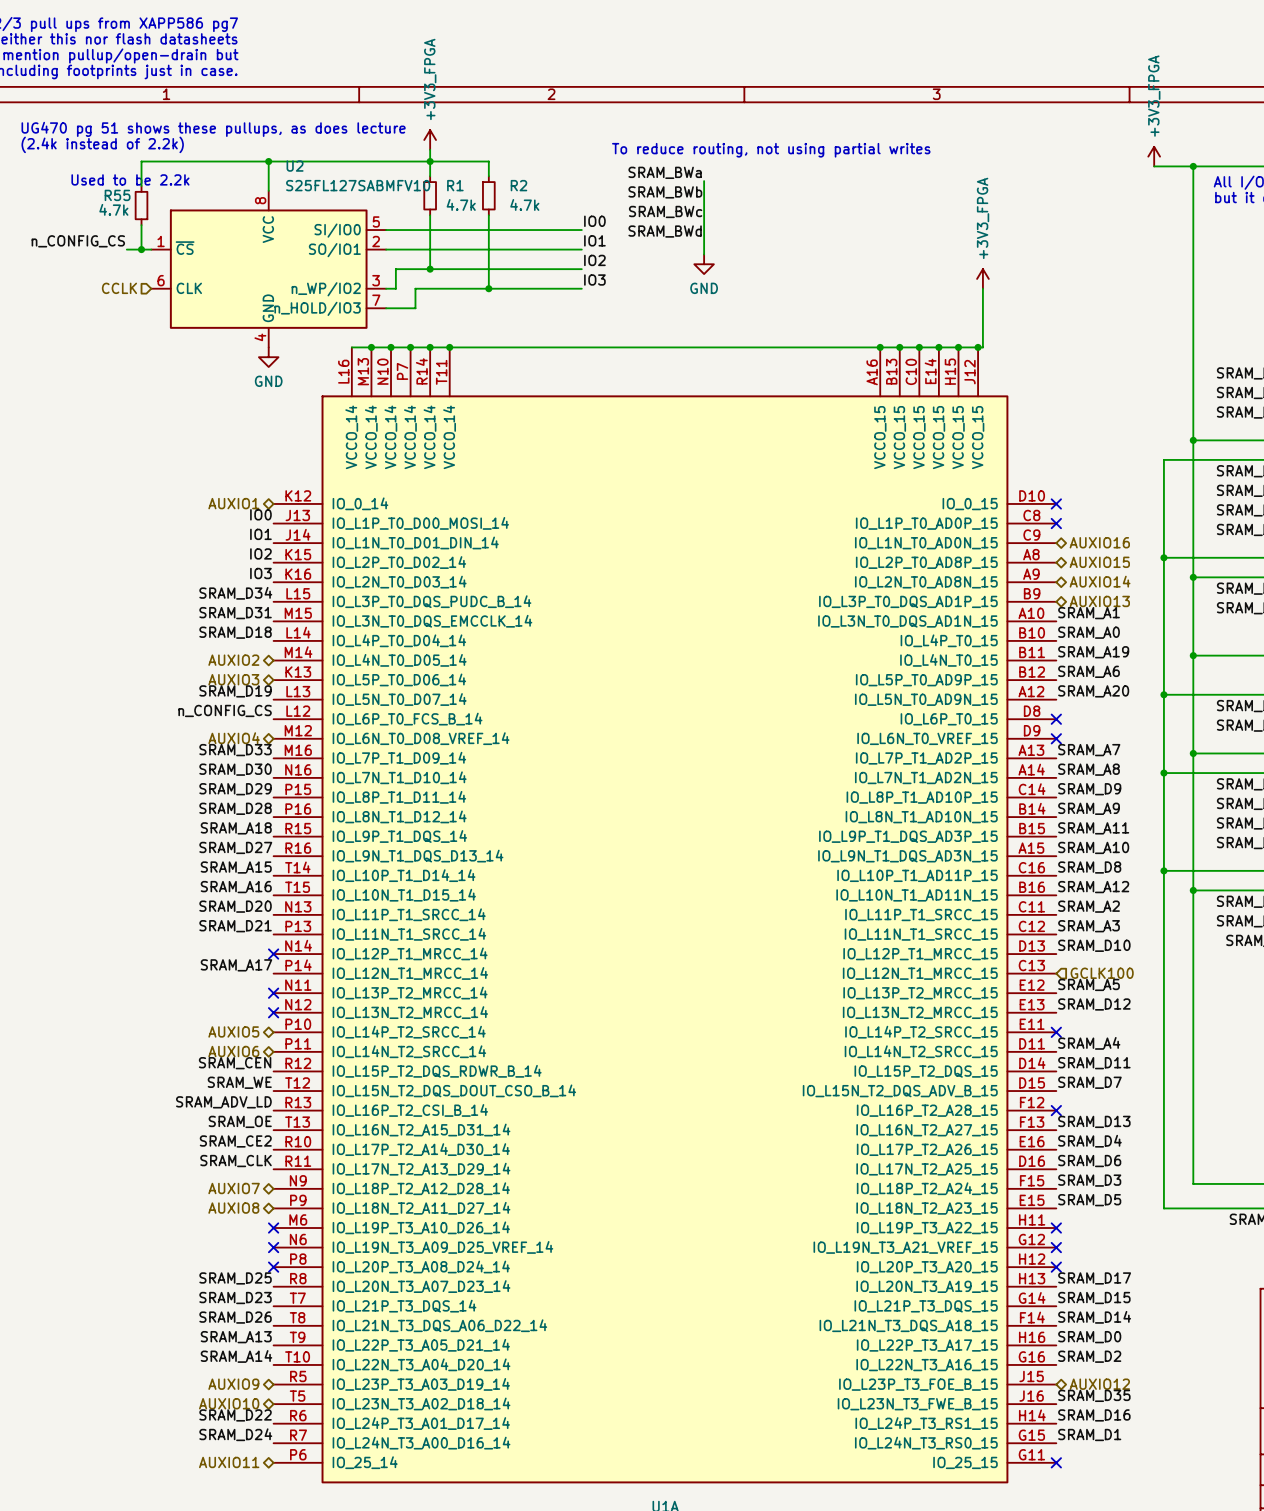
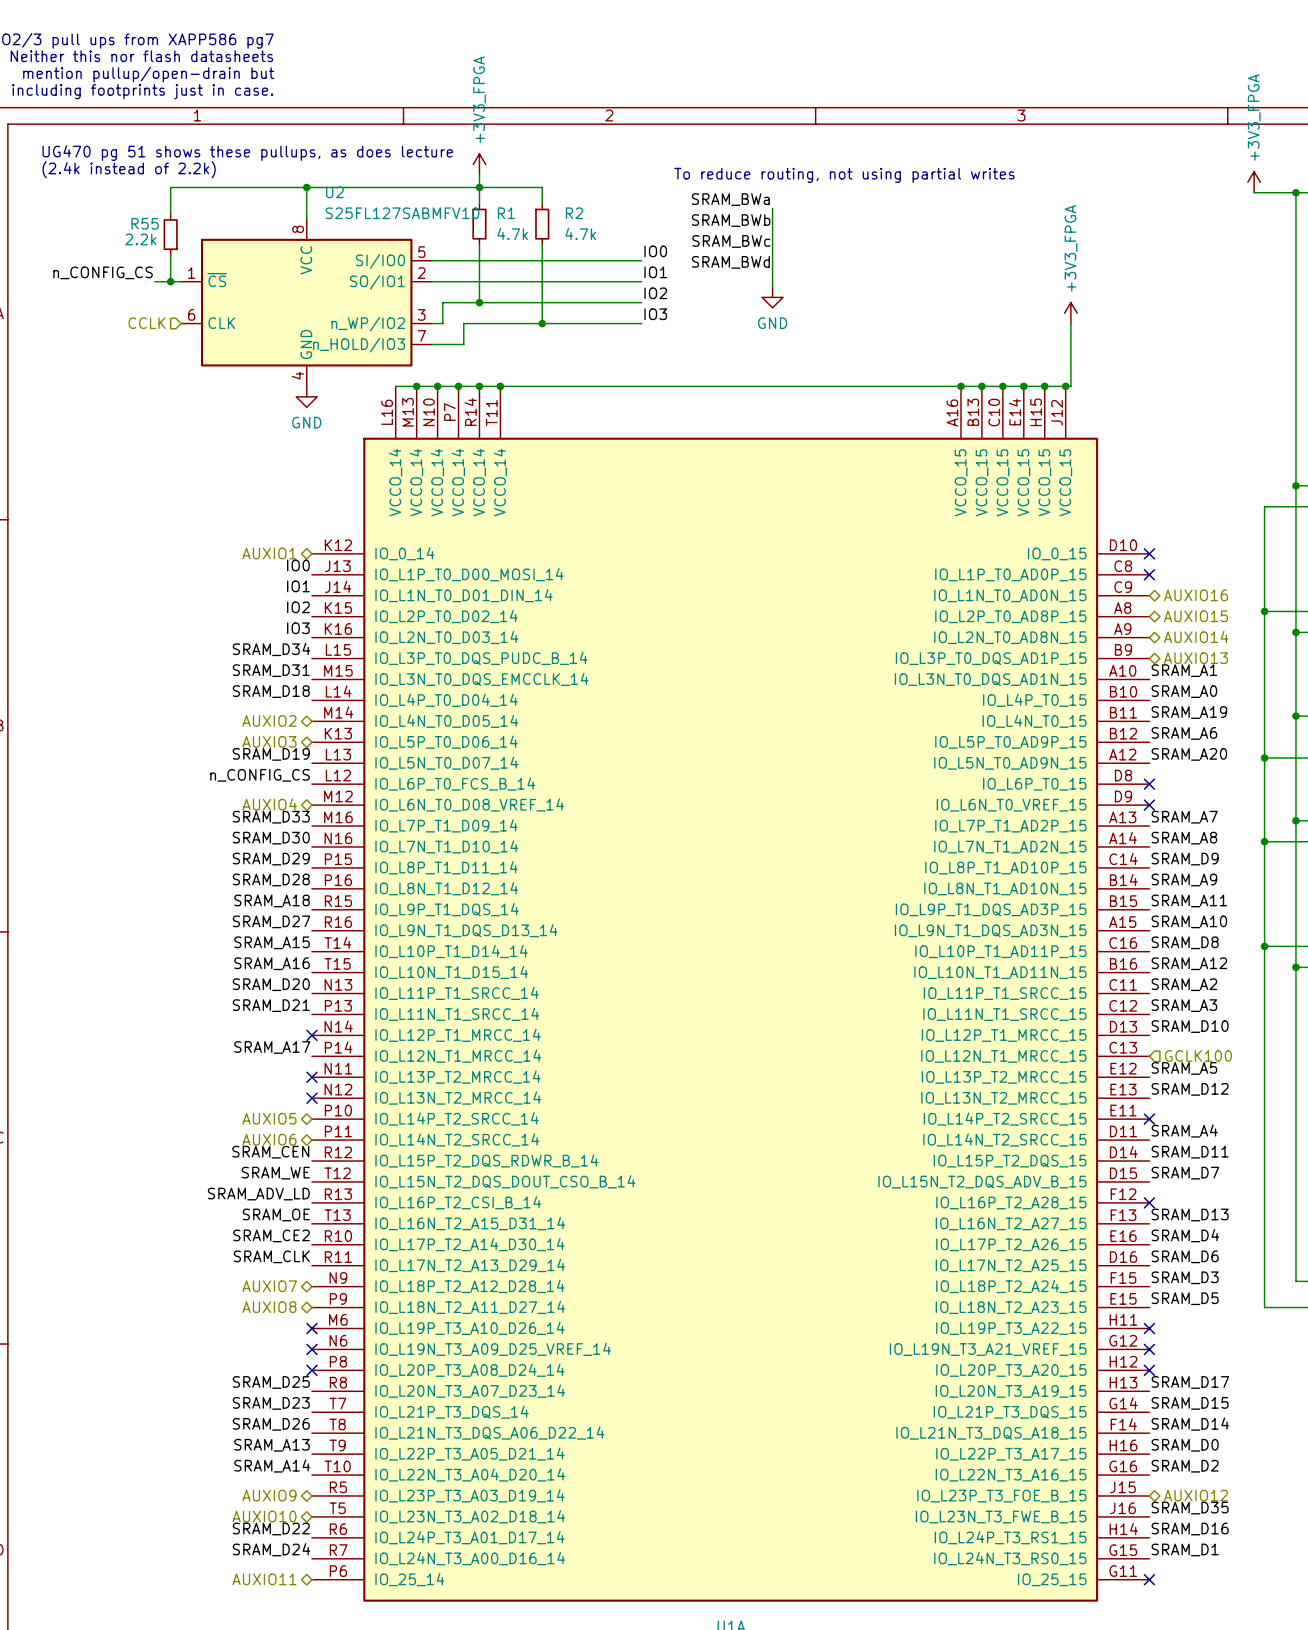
text: Used to be 2.2k (130, 179) -> none
R55 value: 4.7k (113, 209) -> 2.2k (140, 239)

